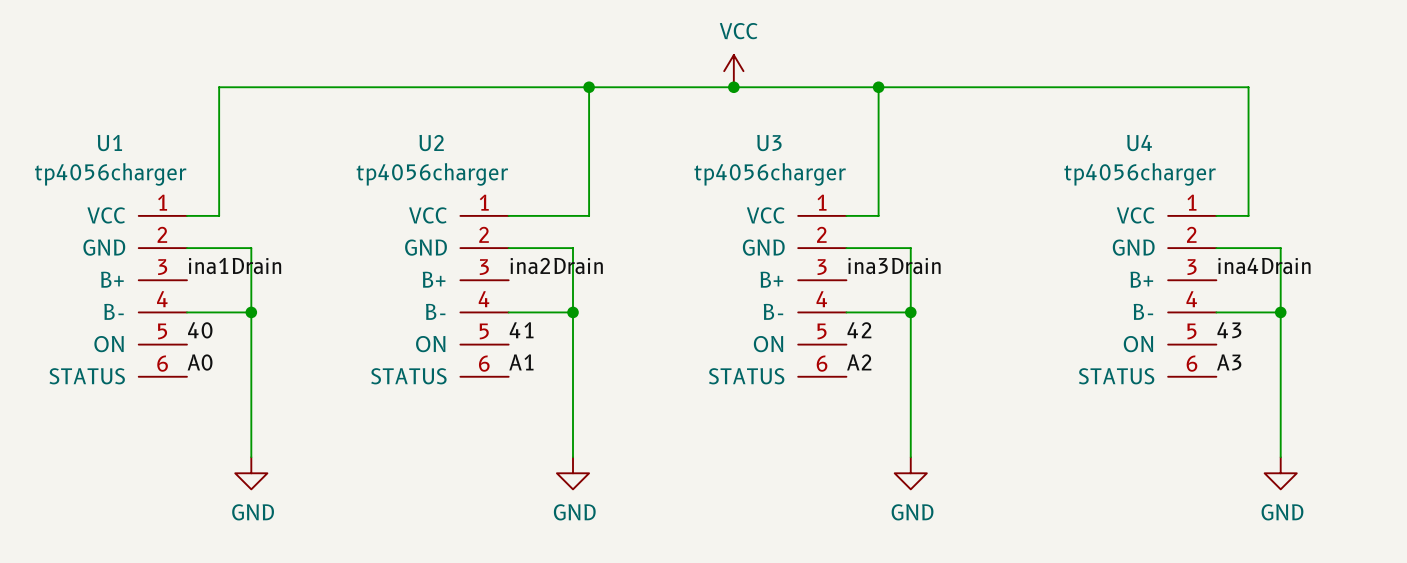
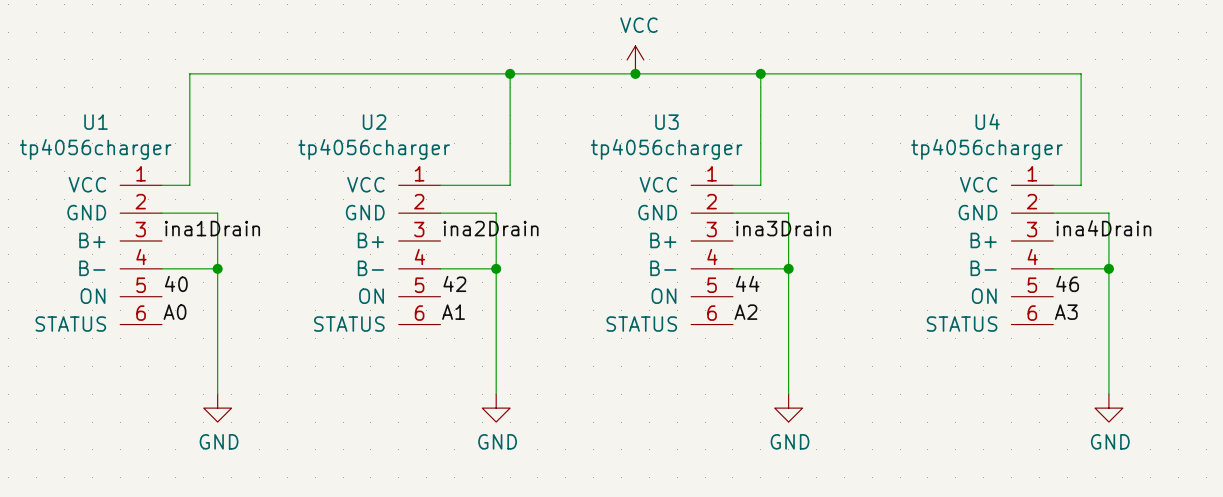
label: 41 (521, 330) -> 42 (454, 283)
label: 42 (859, 330) -> 44 (747, 283)
label: 43 (1229, 330) -> 46 (1067, 283)

